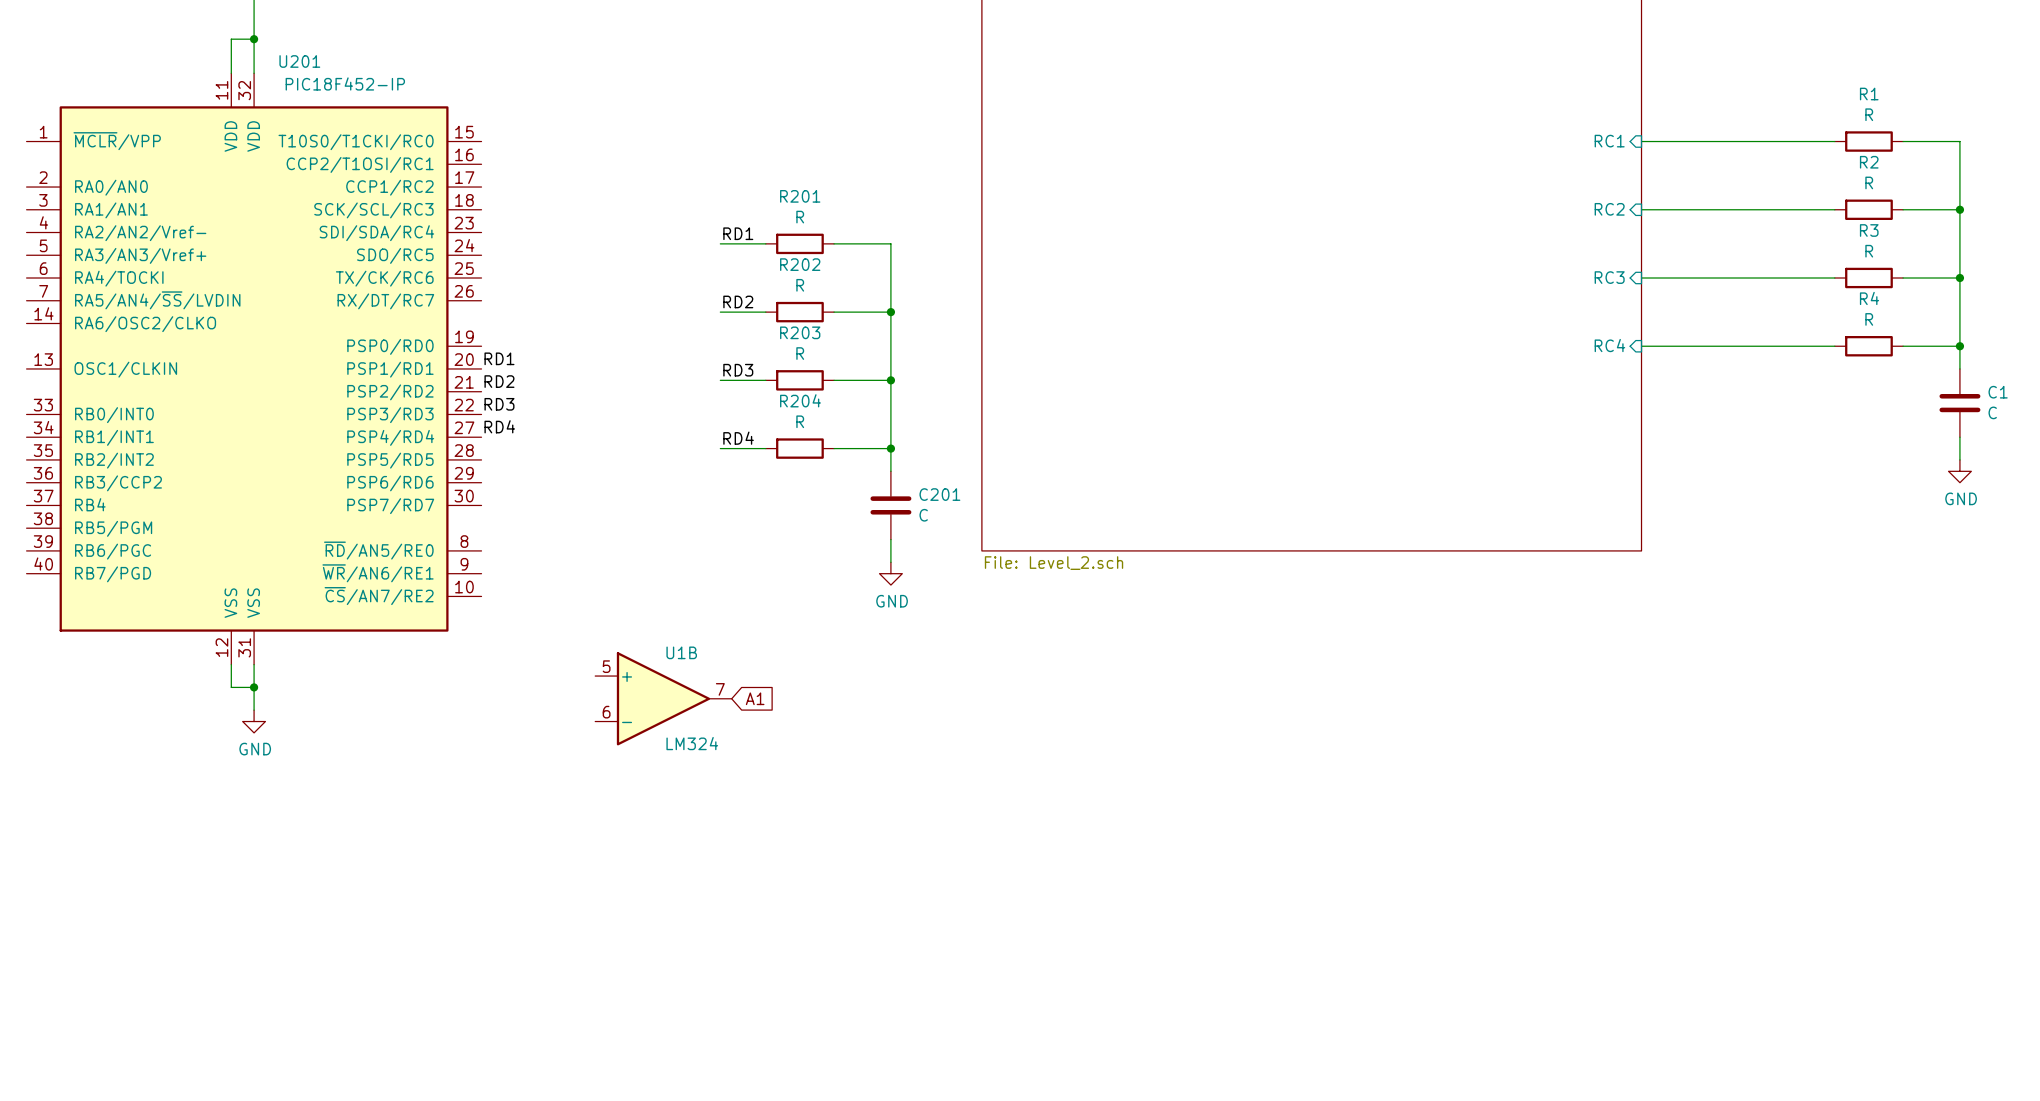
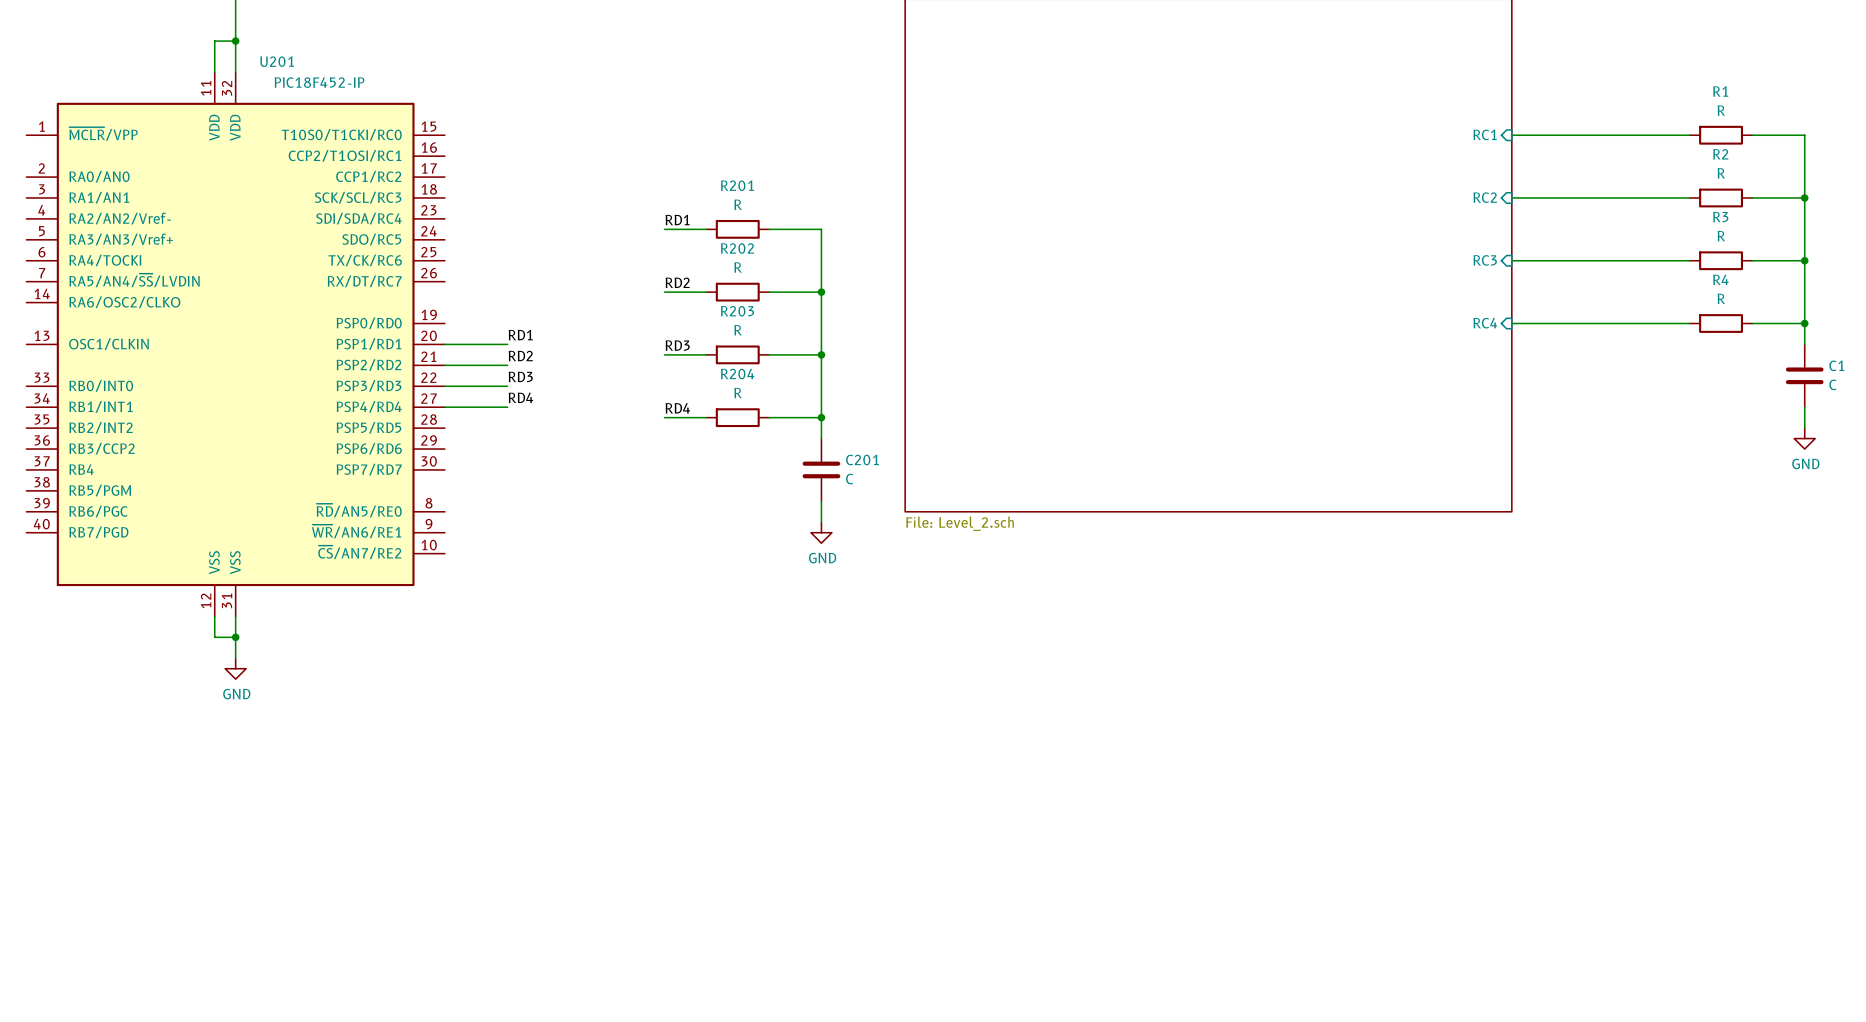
label position: RD1 (499, 358) -> RD1 (520, 335)
wire: none -> (444, 344) (507, 344)
label position: RD2 (499, 381) -> RD2 (520, 356)
wire: none -> (444, 365) (507, 365)
label position: RD3 (499, 404) -> RD3 (520, 376)
wire: none -> (444, 386) (507, 386)
label position: RD4 (499, 426) -> RD4 (520, 397)
wire: none -> (444, 407) (507, 407)
U1B: LM324 (663, 698) -> none
global label: A1 (755, 698) -> none

